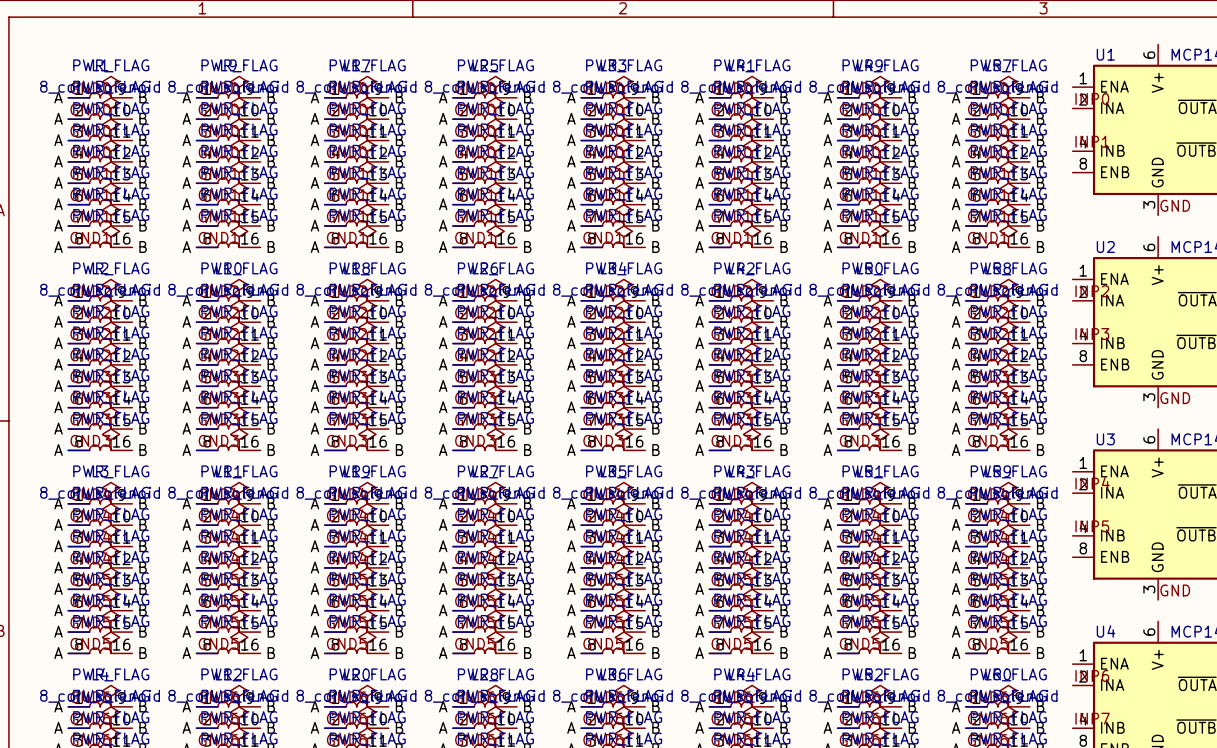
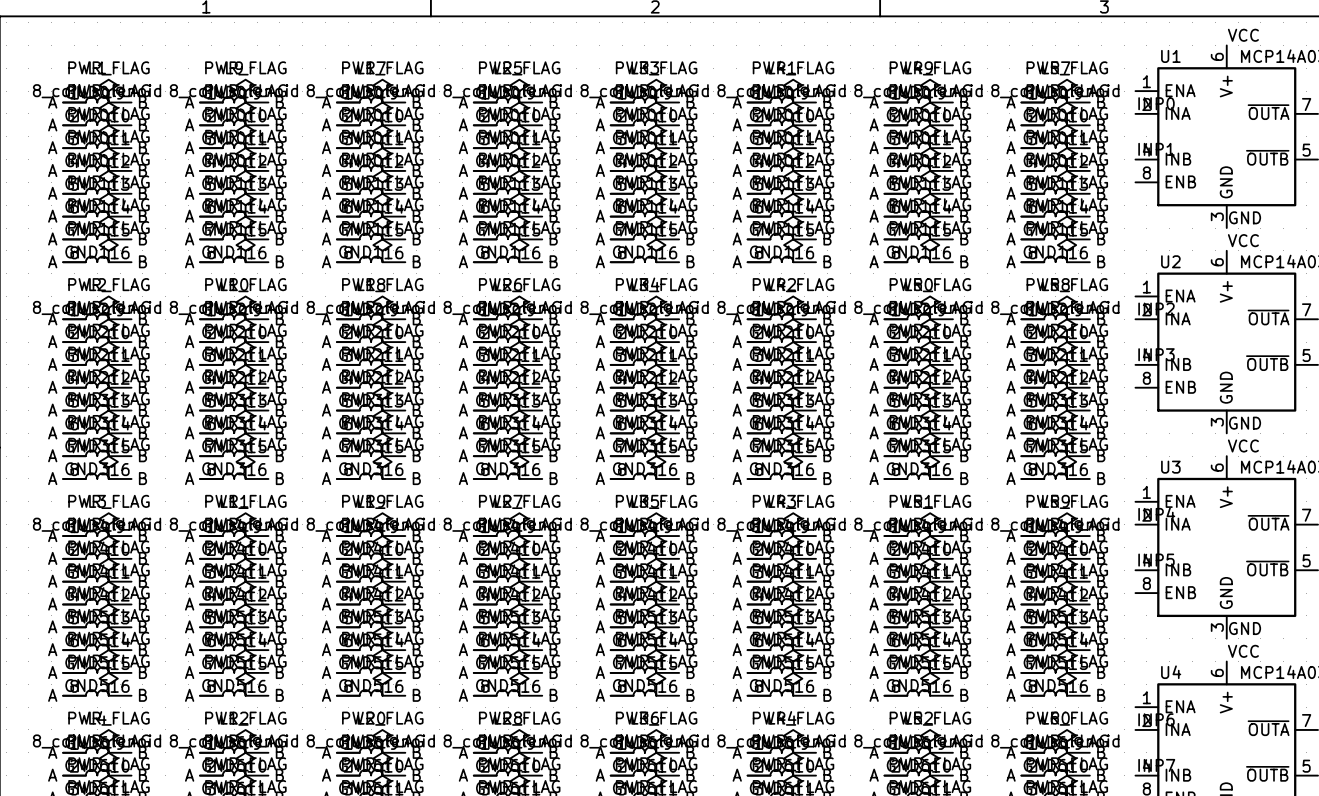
label: none -> VCC (1243, 35)
label: none -> VCC (1243, 240)
label: none -> VCC (1243, 445)
label: none -> VCC (1243, 651)

